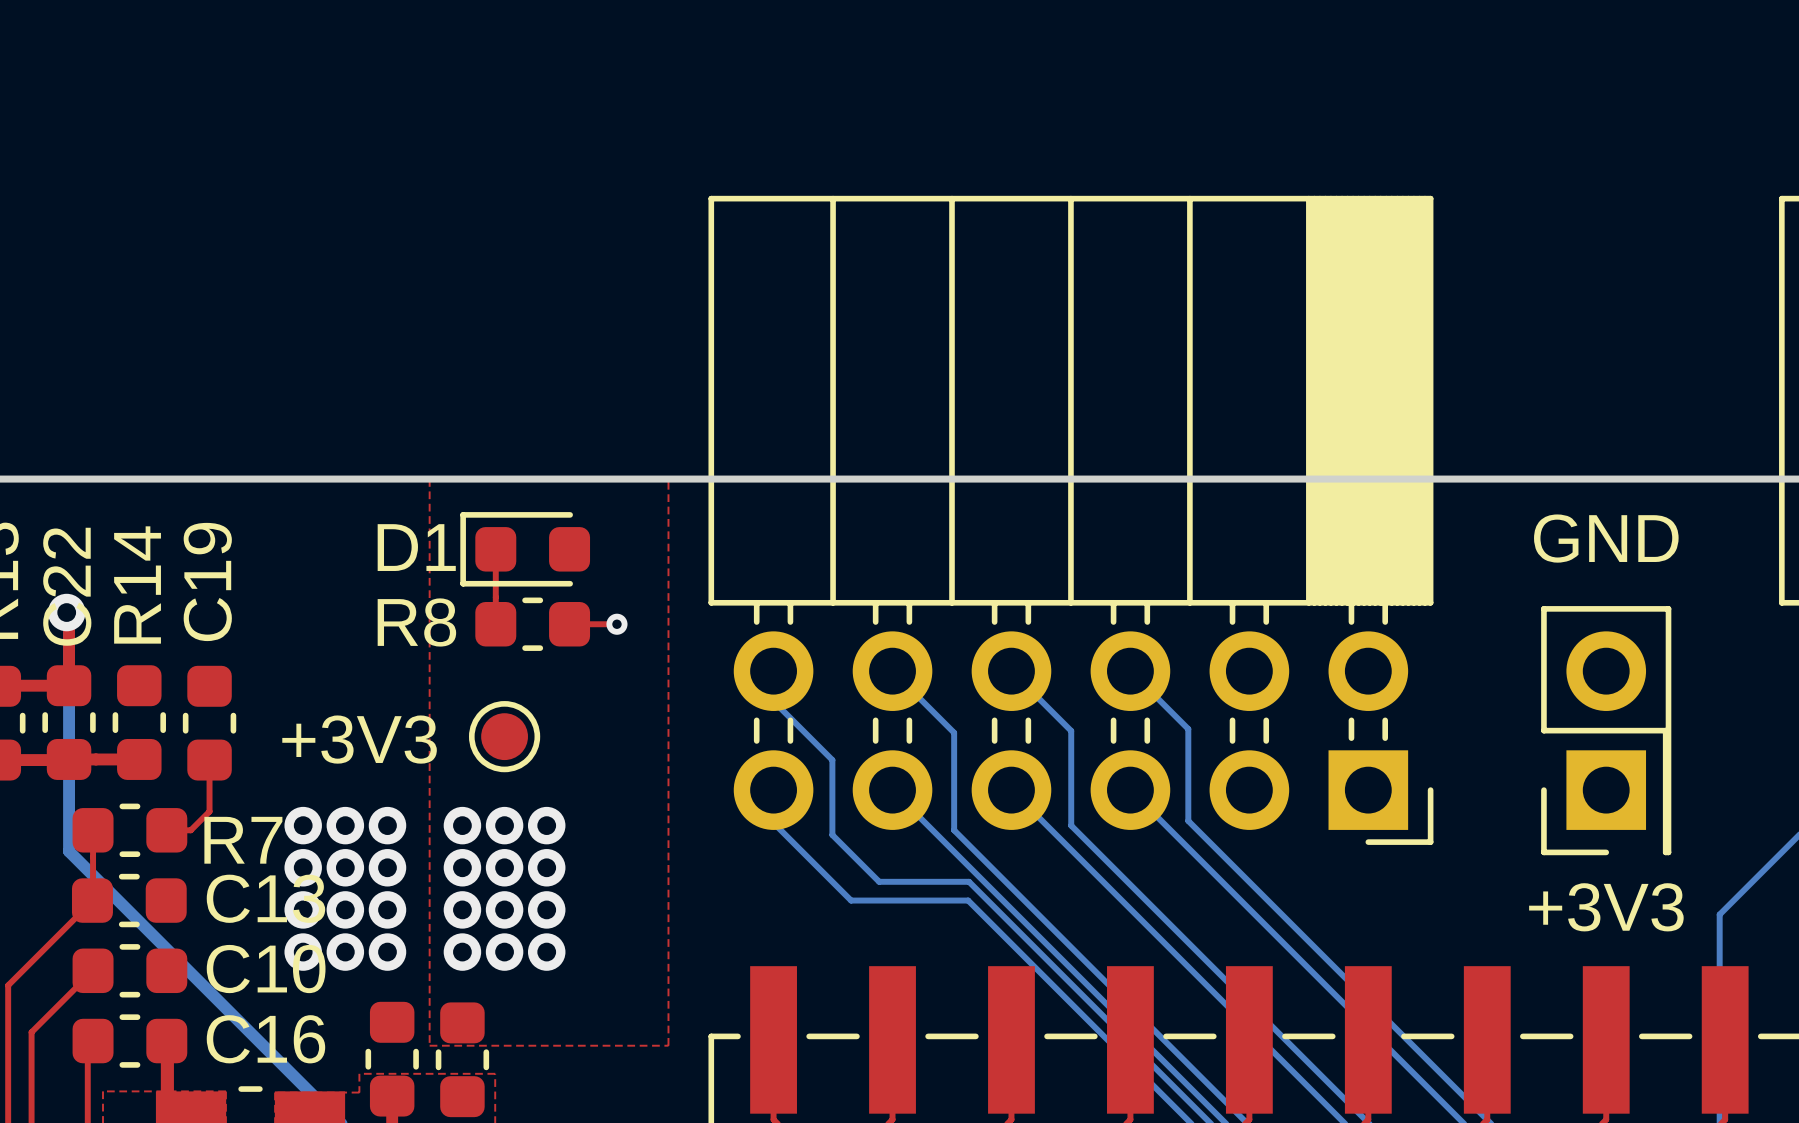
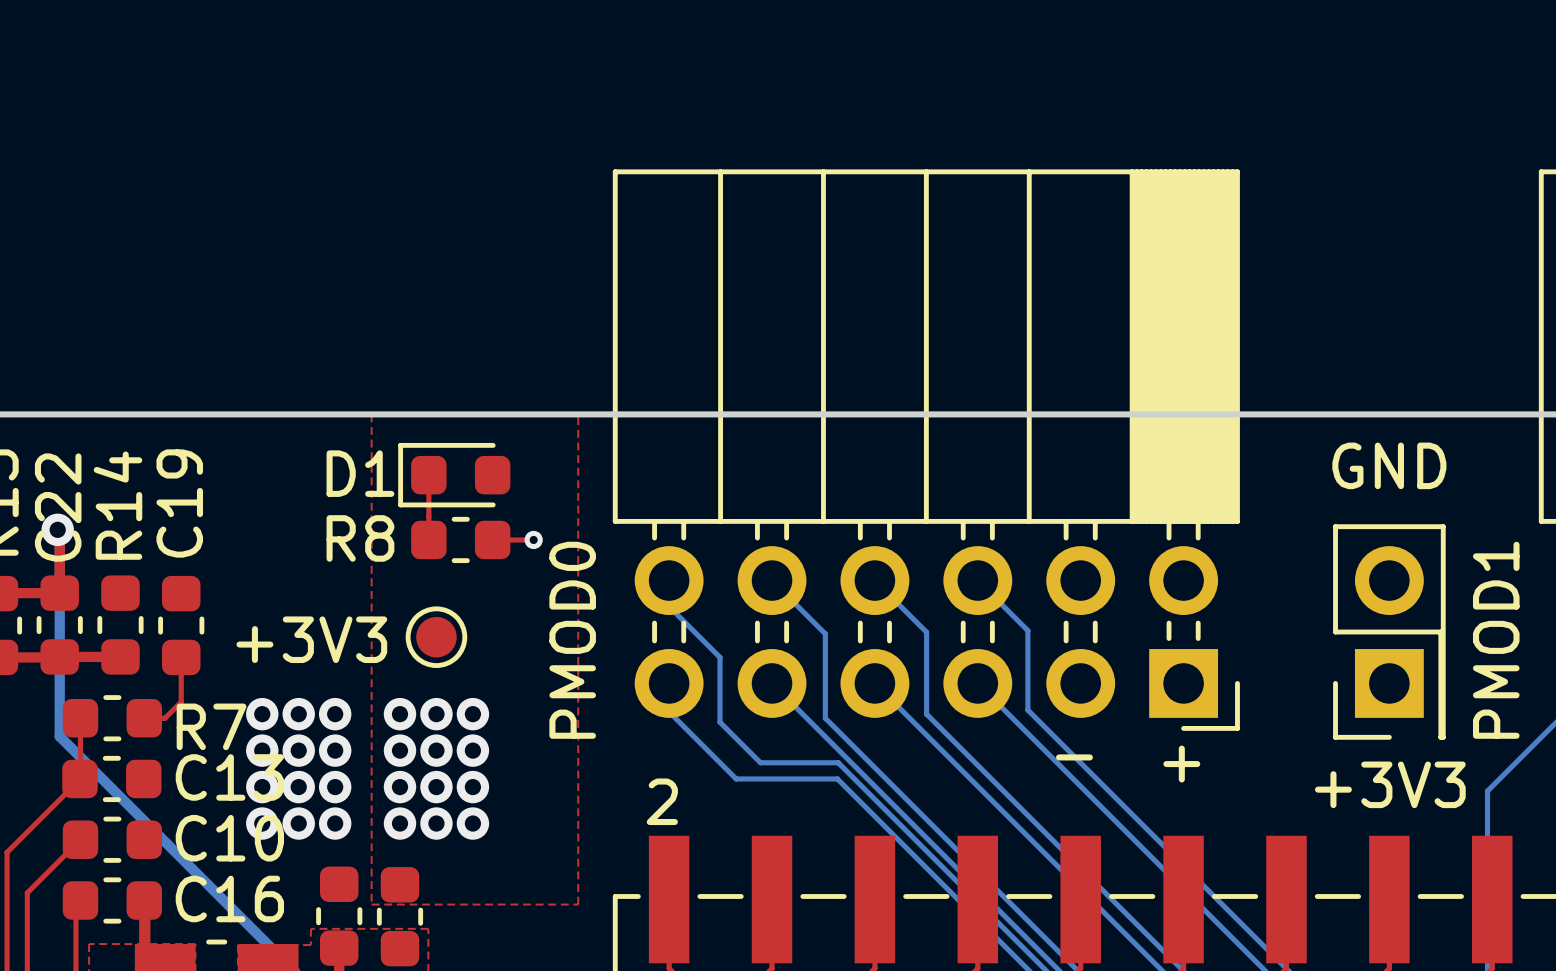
text: none -> PMOD0 (572, 640)
text: none -> PMOD1 (1496, 640)
text: none -> - (1074, 757)
text: none -> + (1181, 764)
text: none -> 2 (662, 801)

